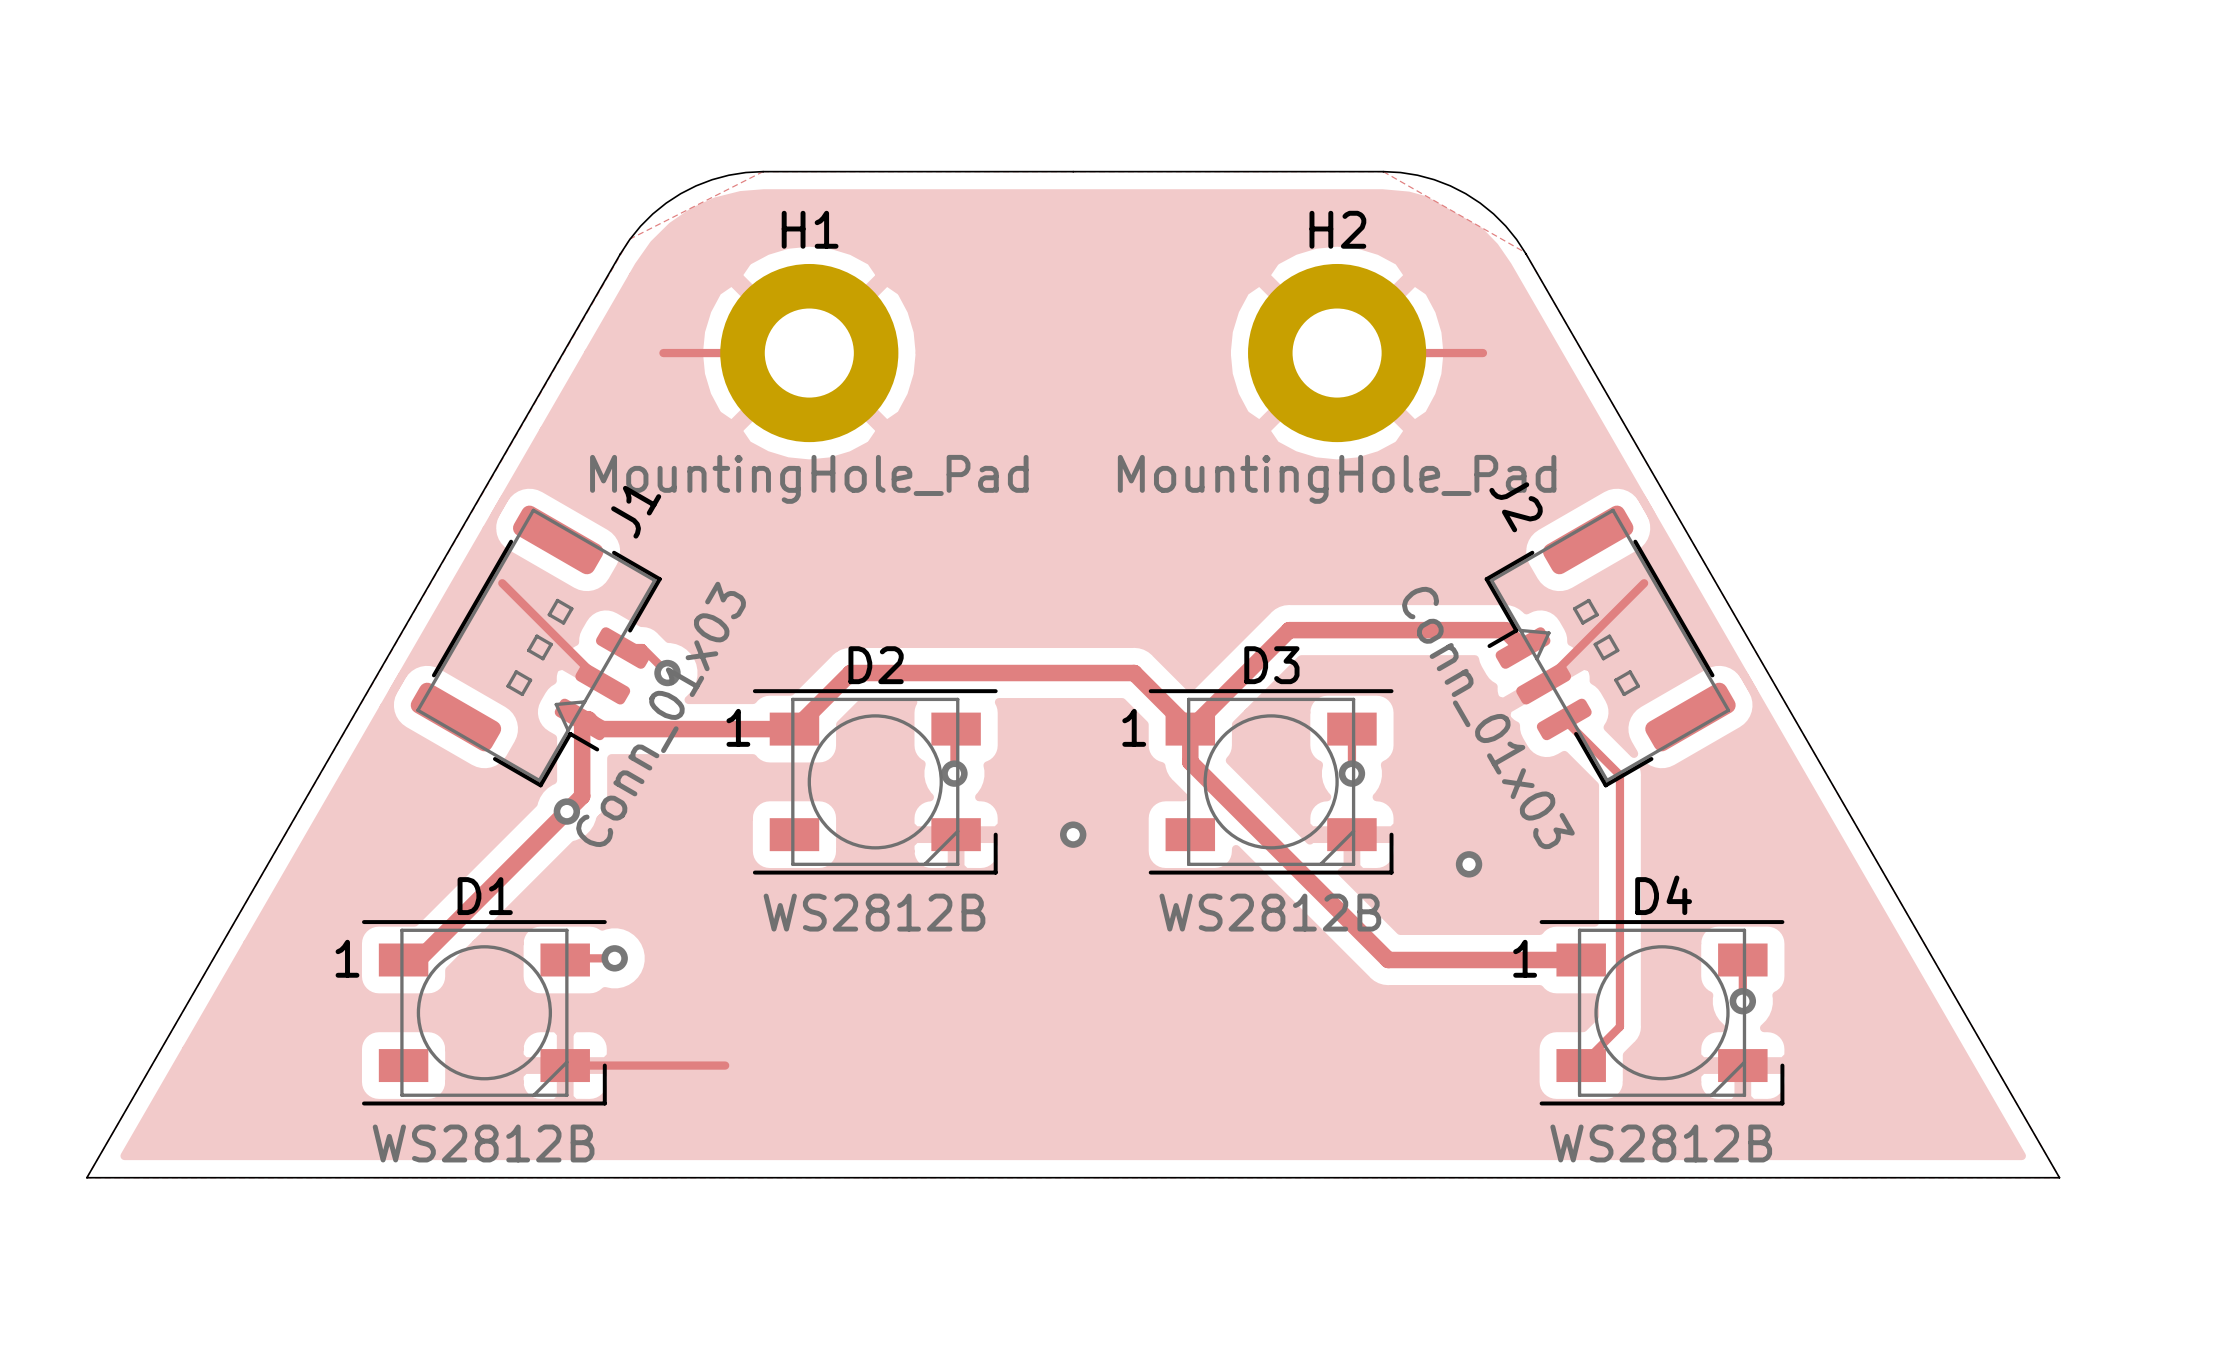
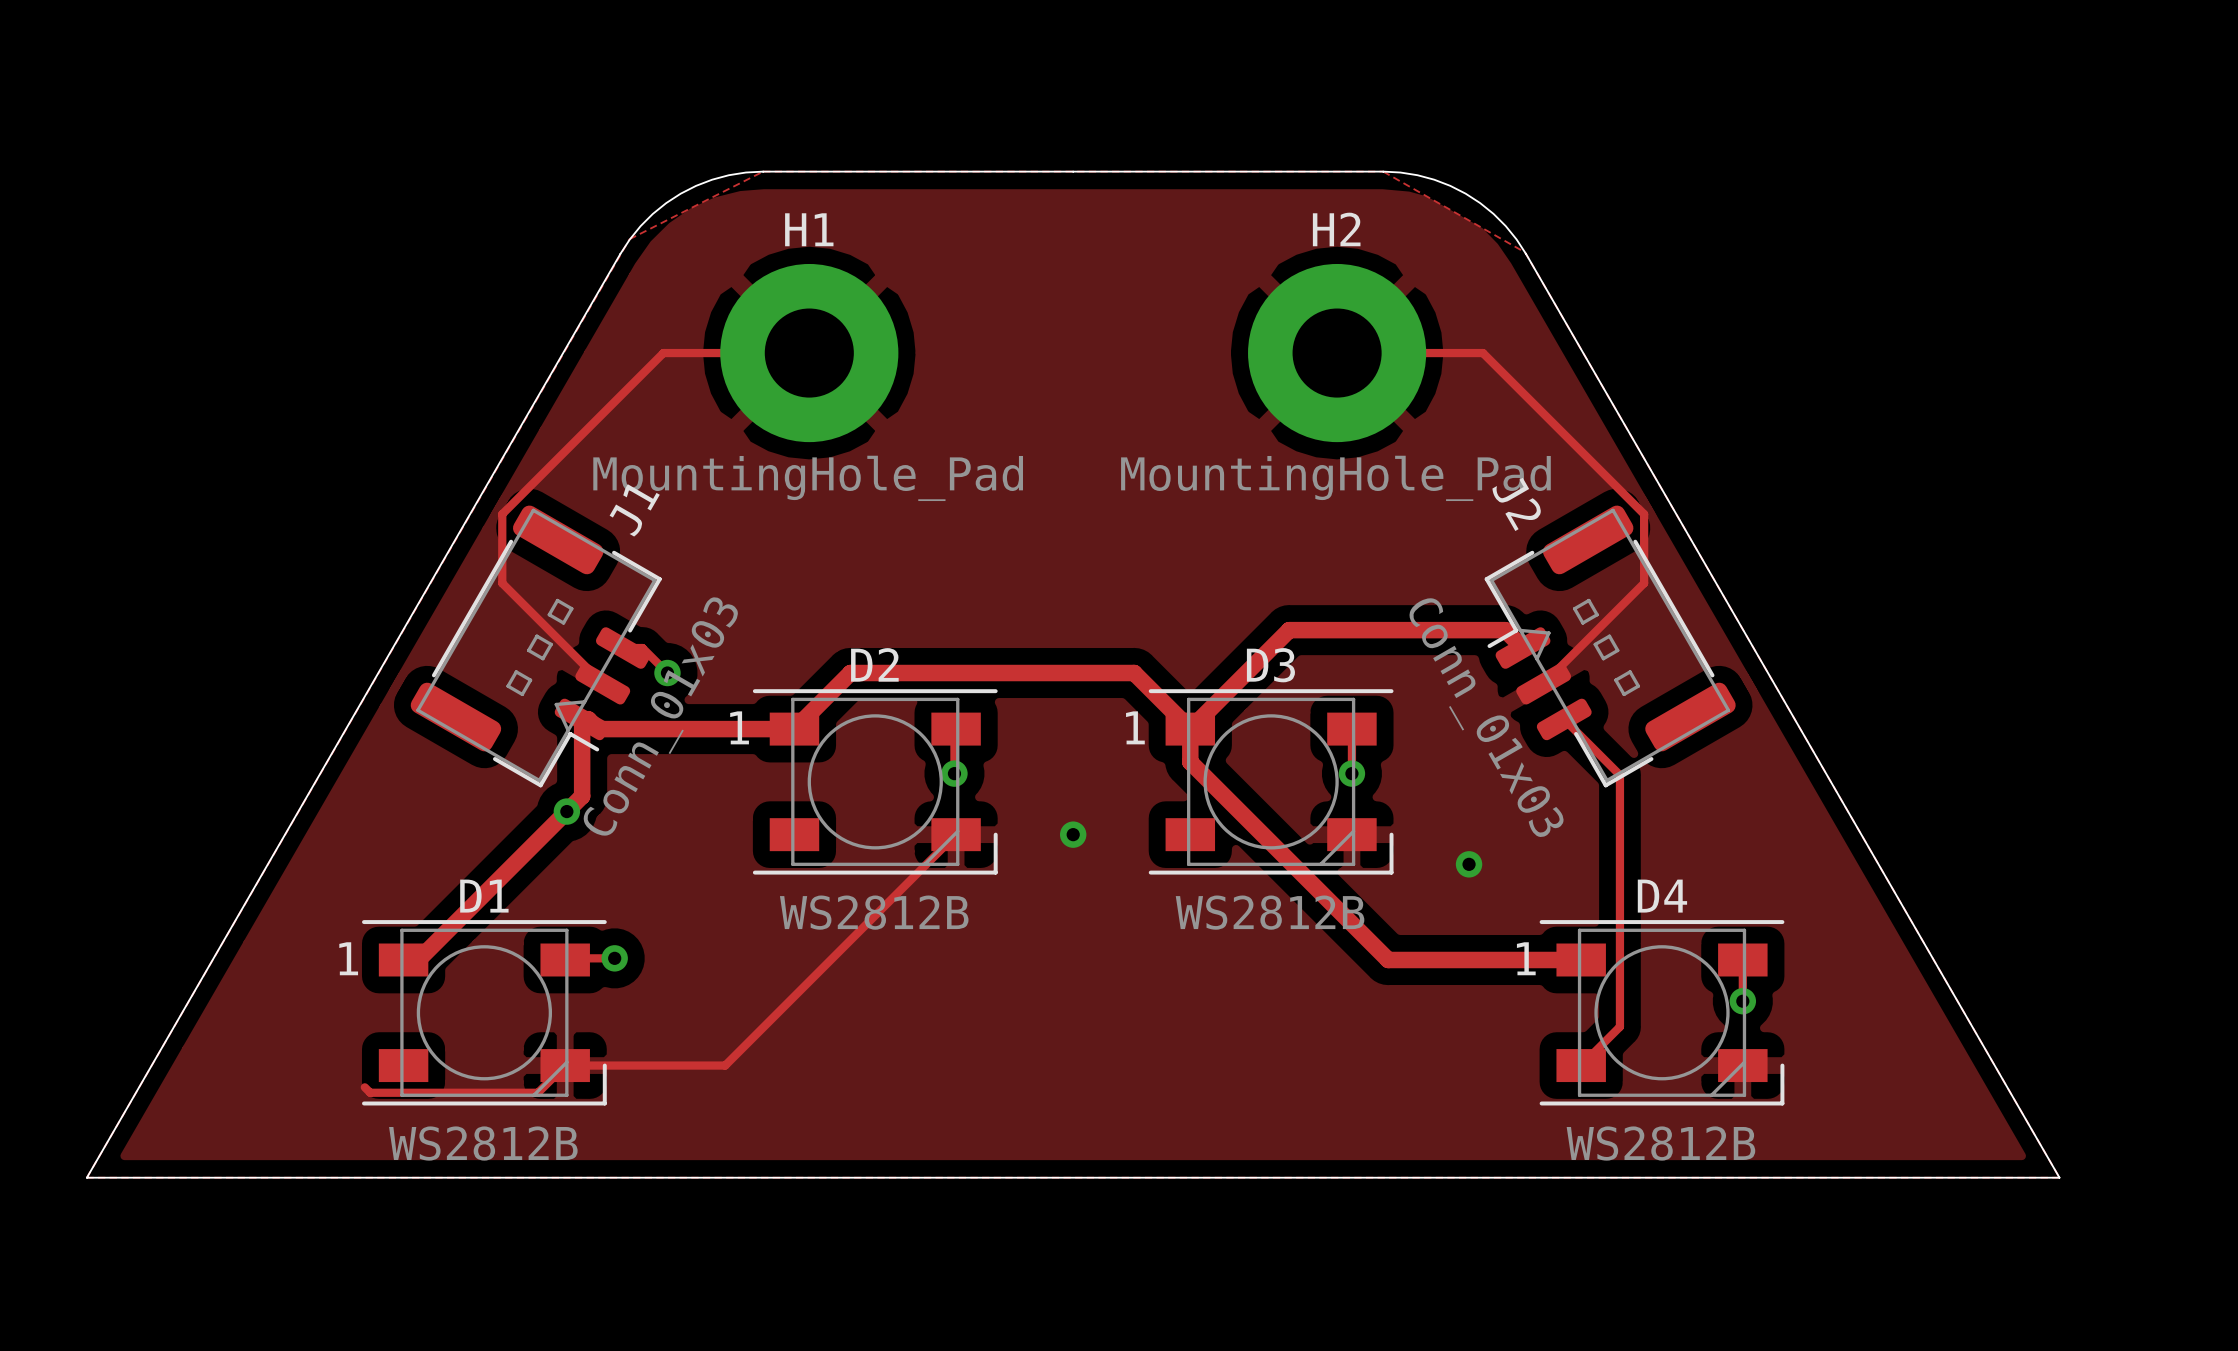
track: none -> (663, 353) (502, 514) (502, 583)
track: none -> (1482, 353) (1644, 514) (1644, 583)
track: none -> (956, 834) (725, 1065)
track: none -> (565, 1065) (537, 1092) (370, 1092) (364, 1087)

